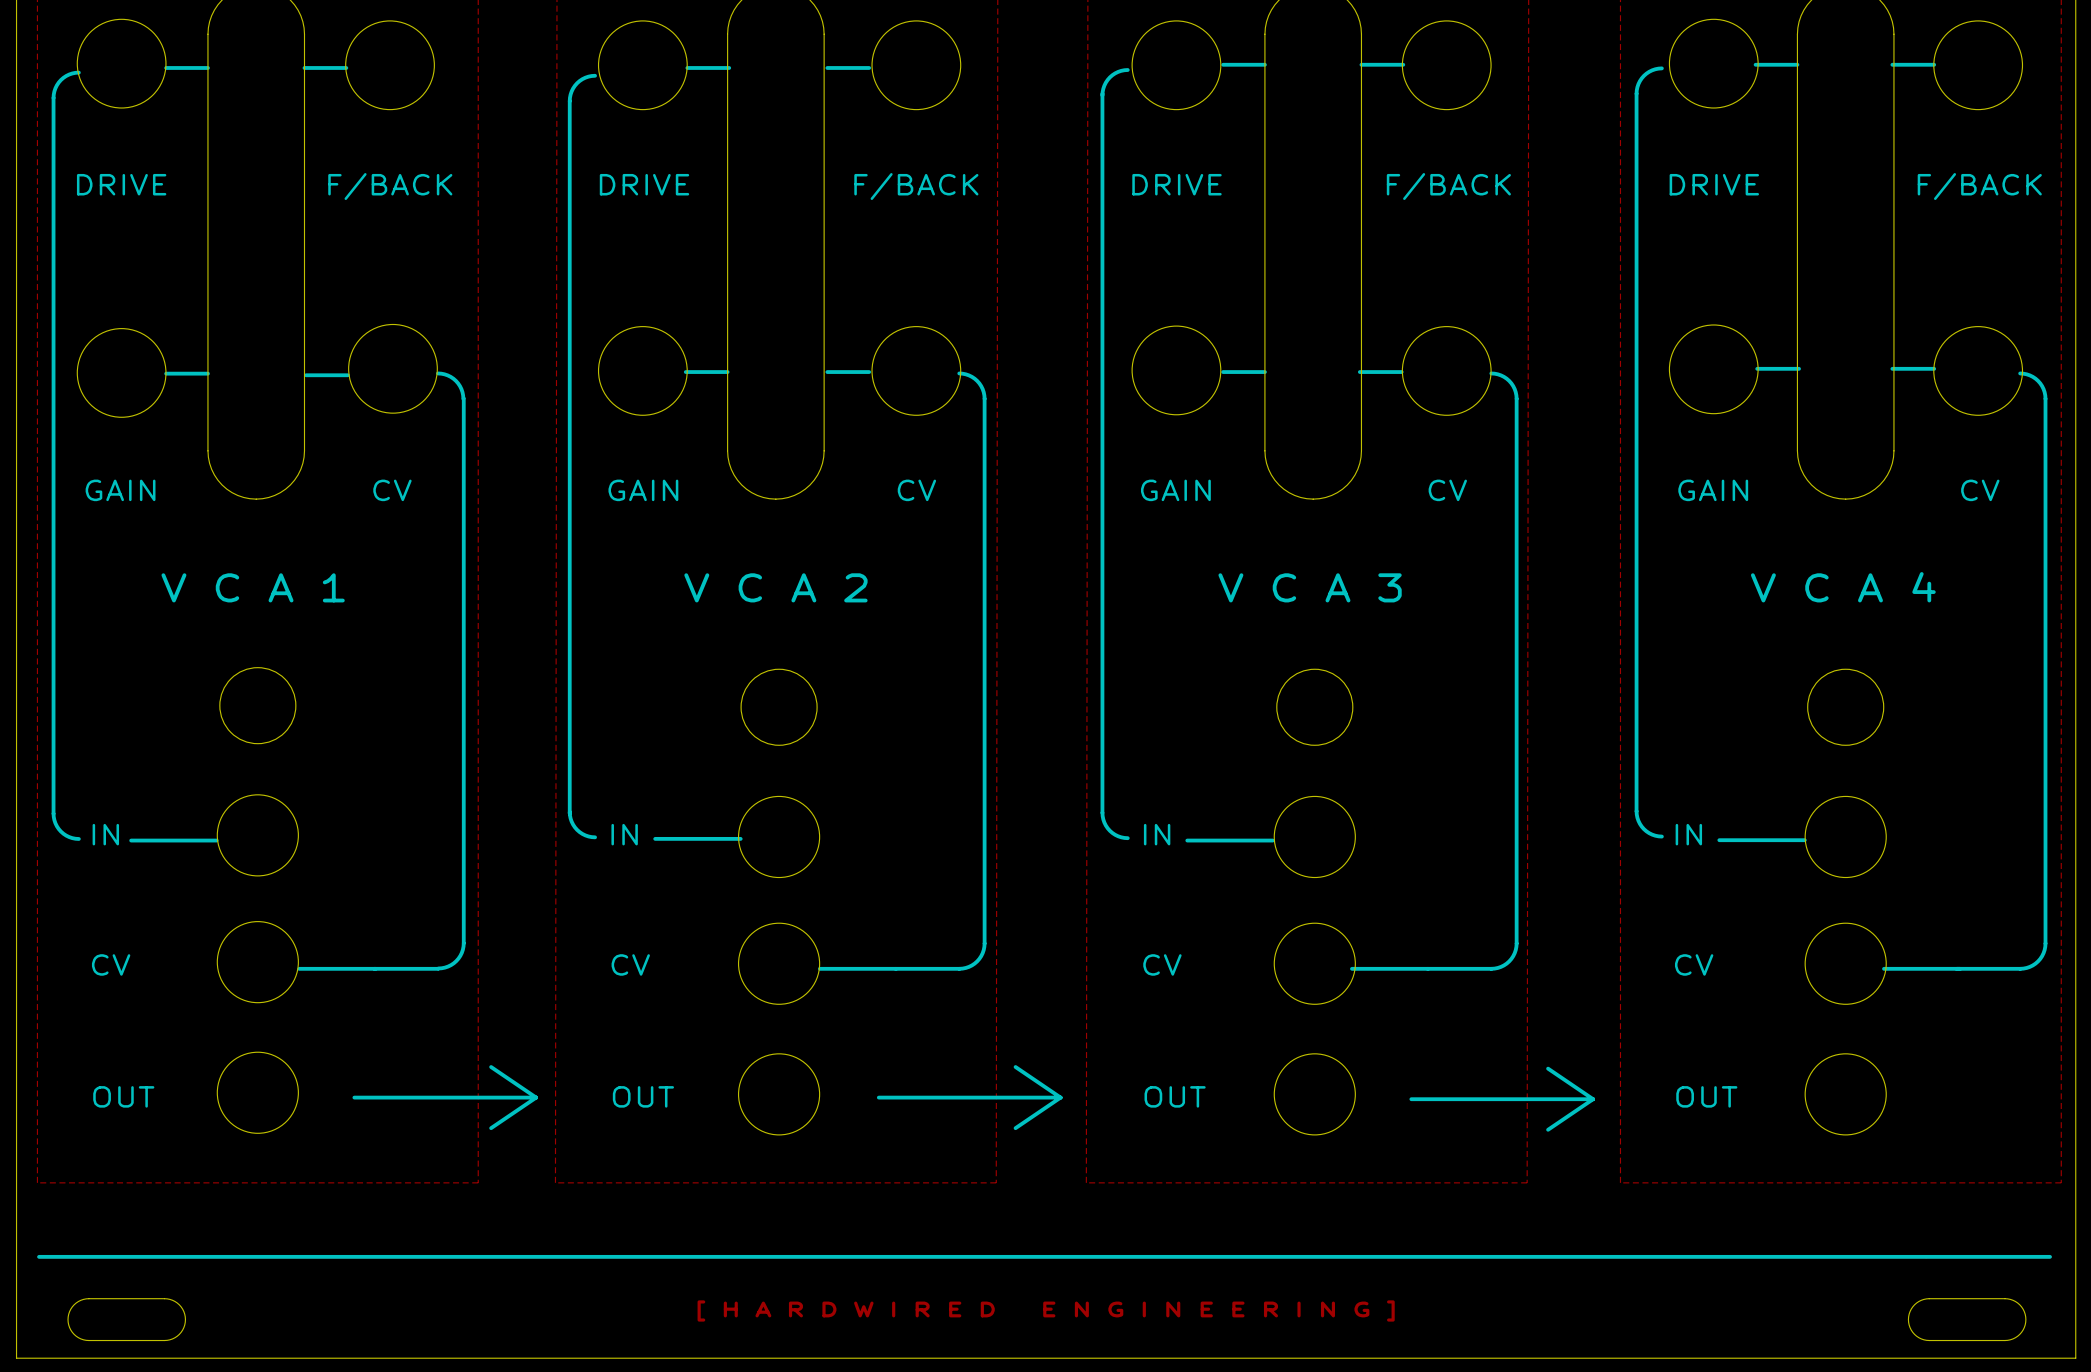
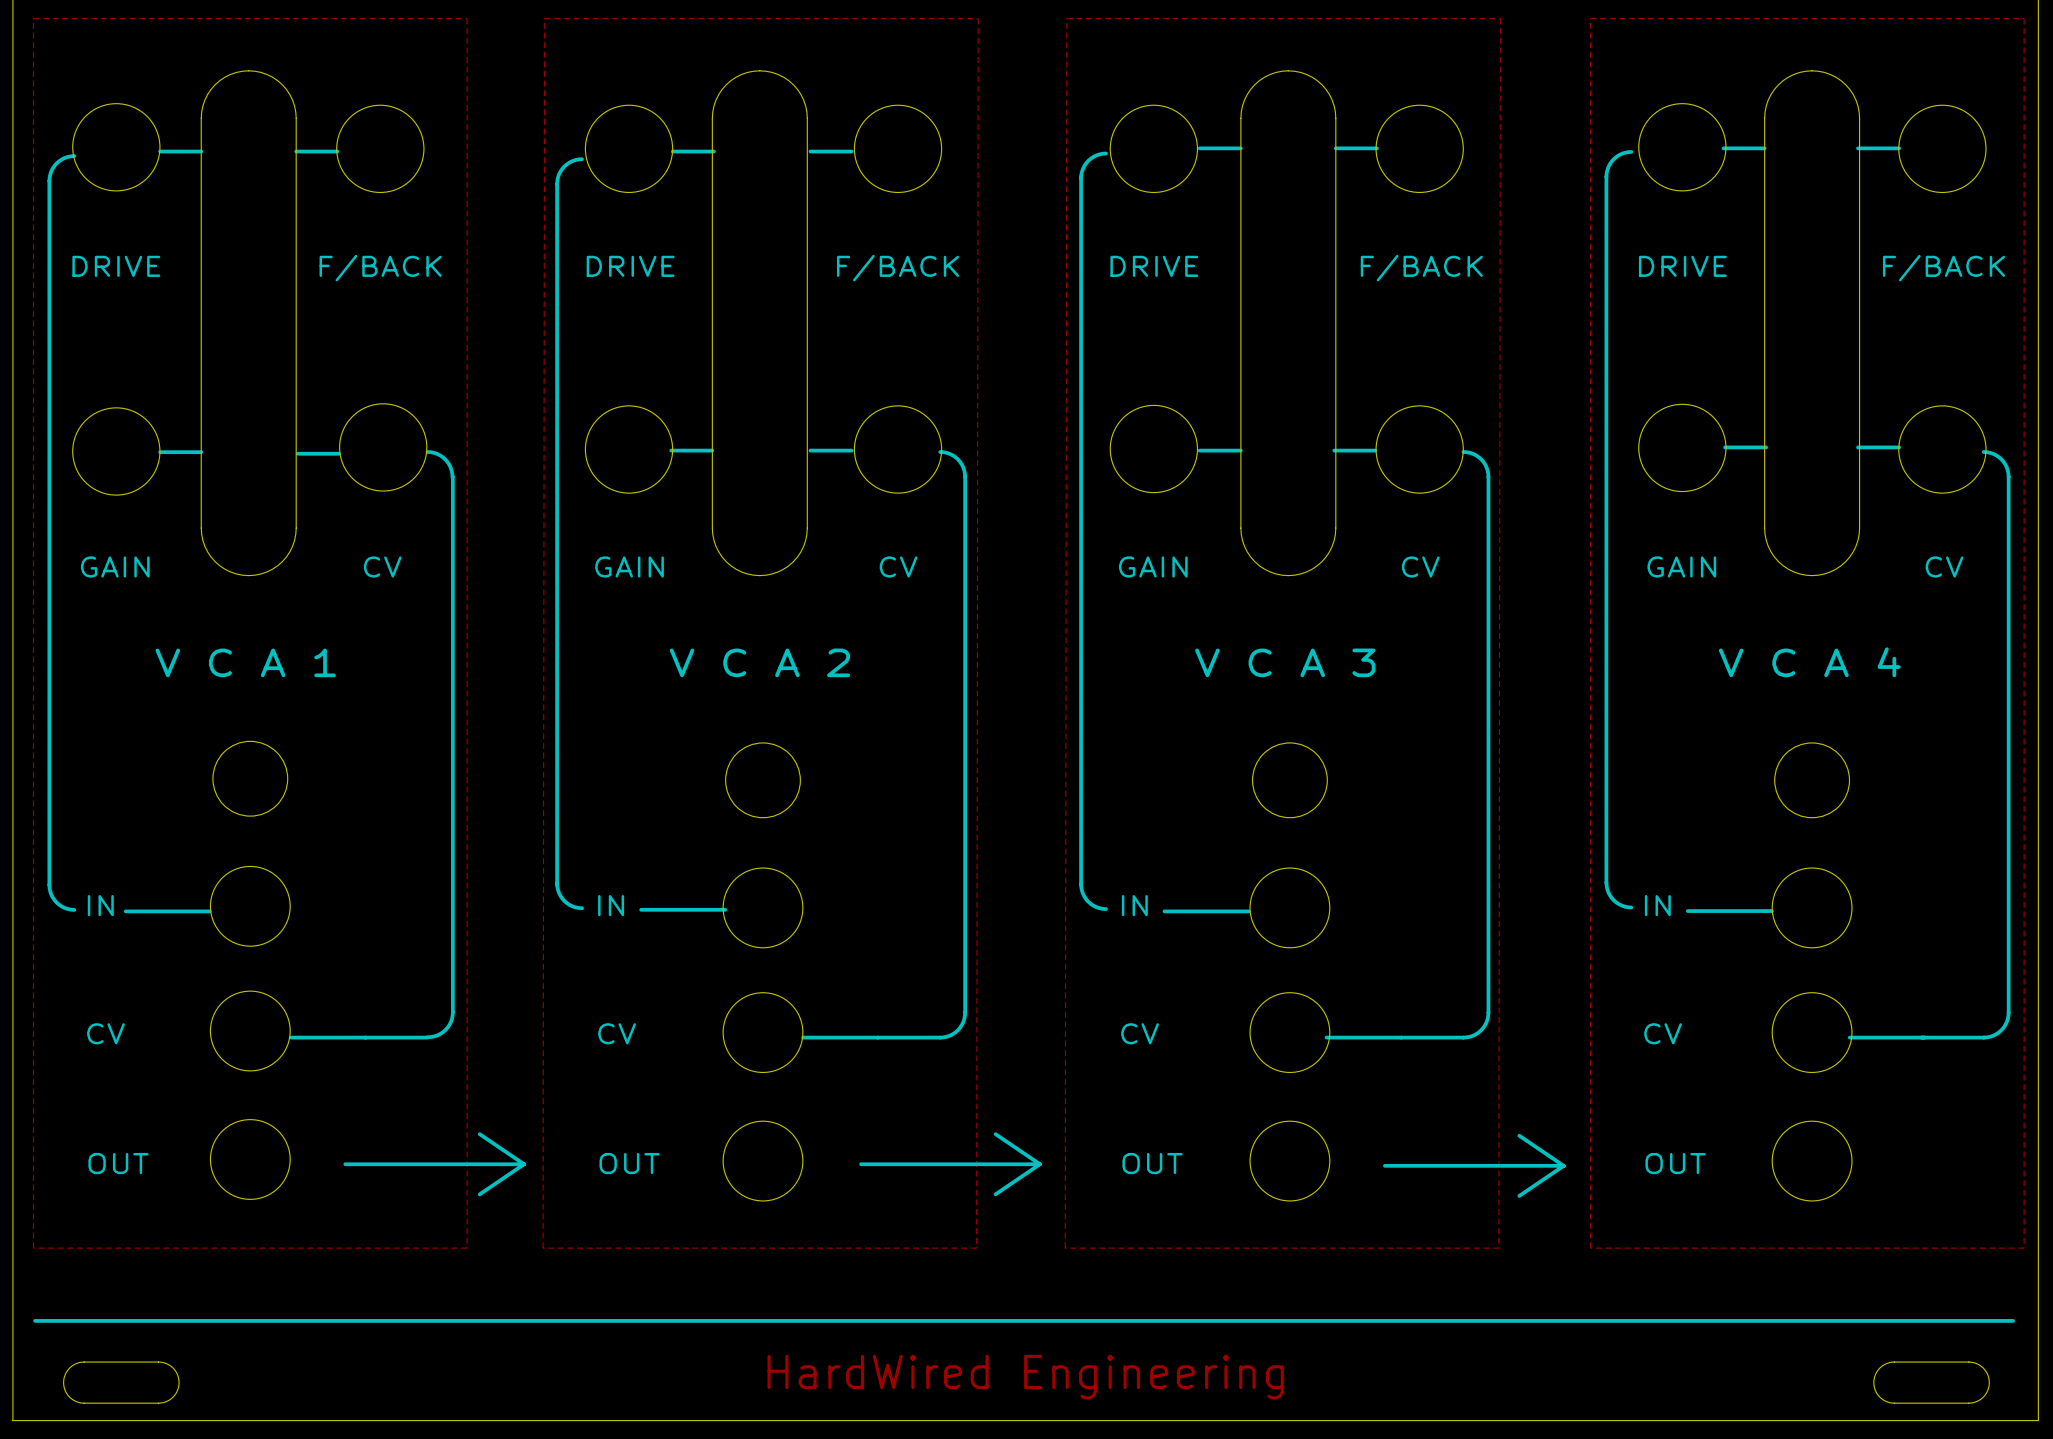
text: [ H A R D W I R E D E N G I N E E R I N G ] (1046, 1310) -> HardWired Engineering (1025, 1377)

